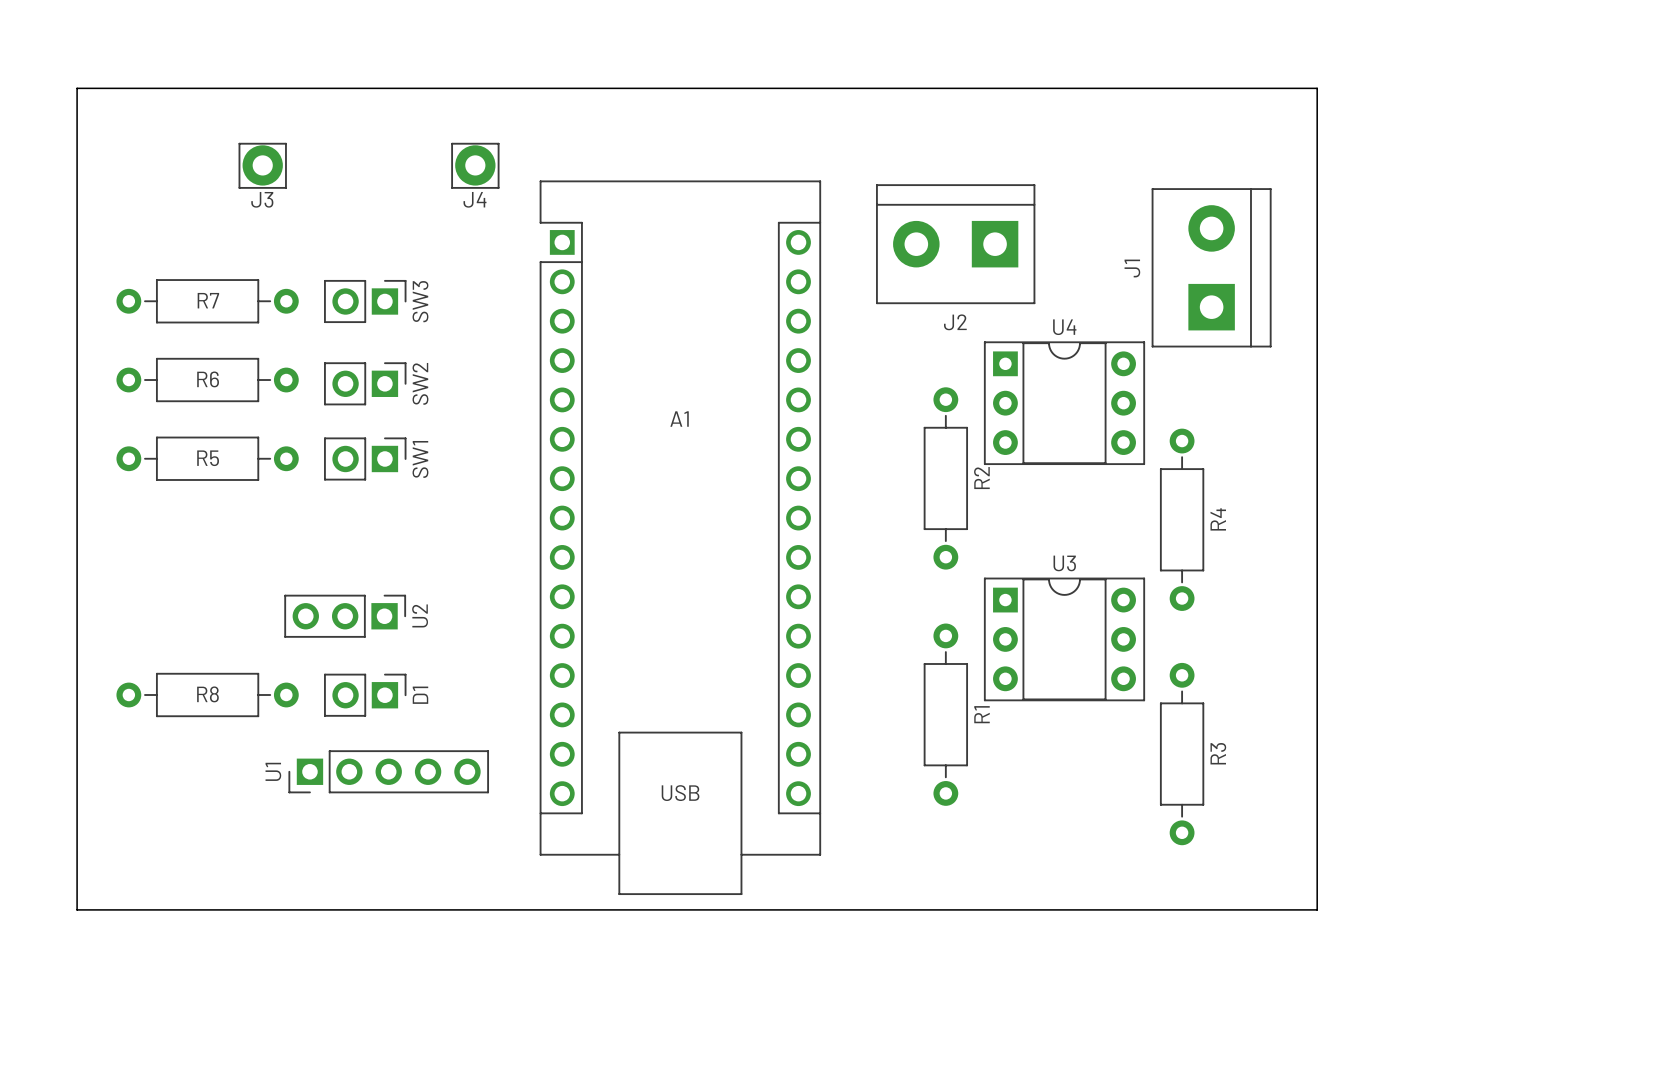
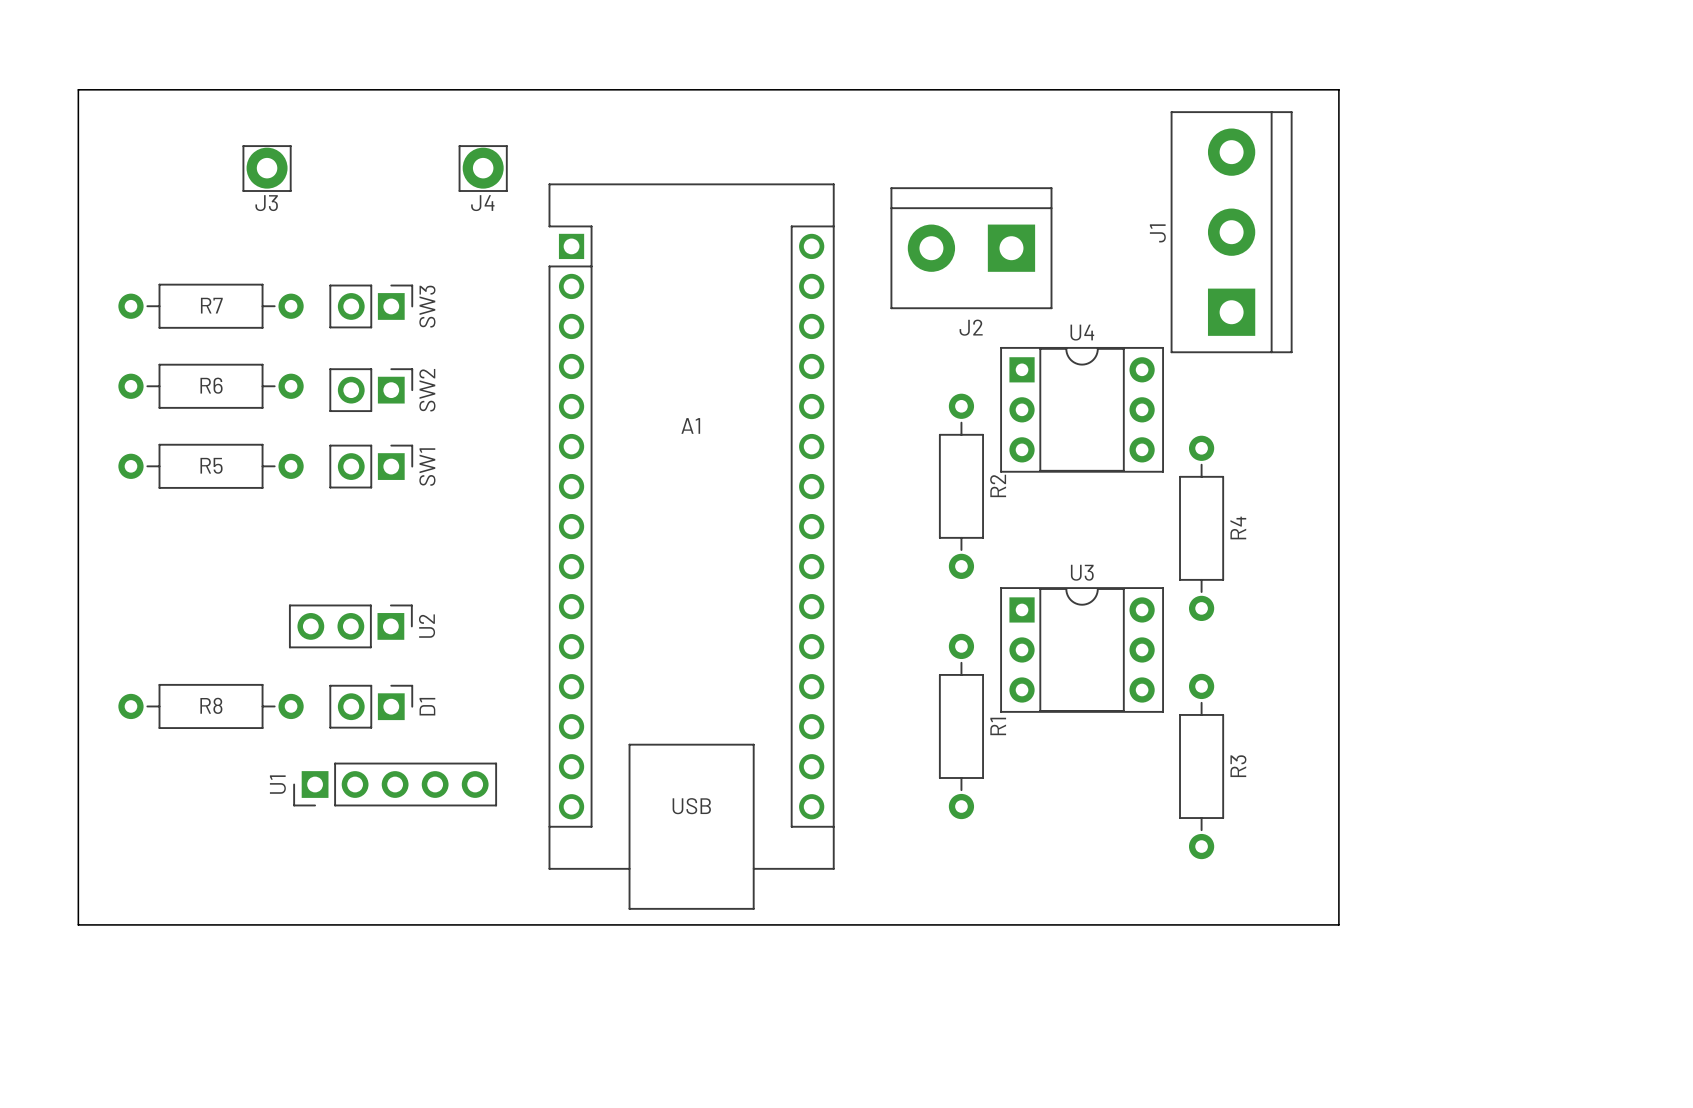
J1 footprint: [1151, 188, 1272, 348] -> [1170, 111, 1293, 354]

